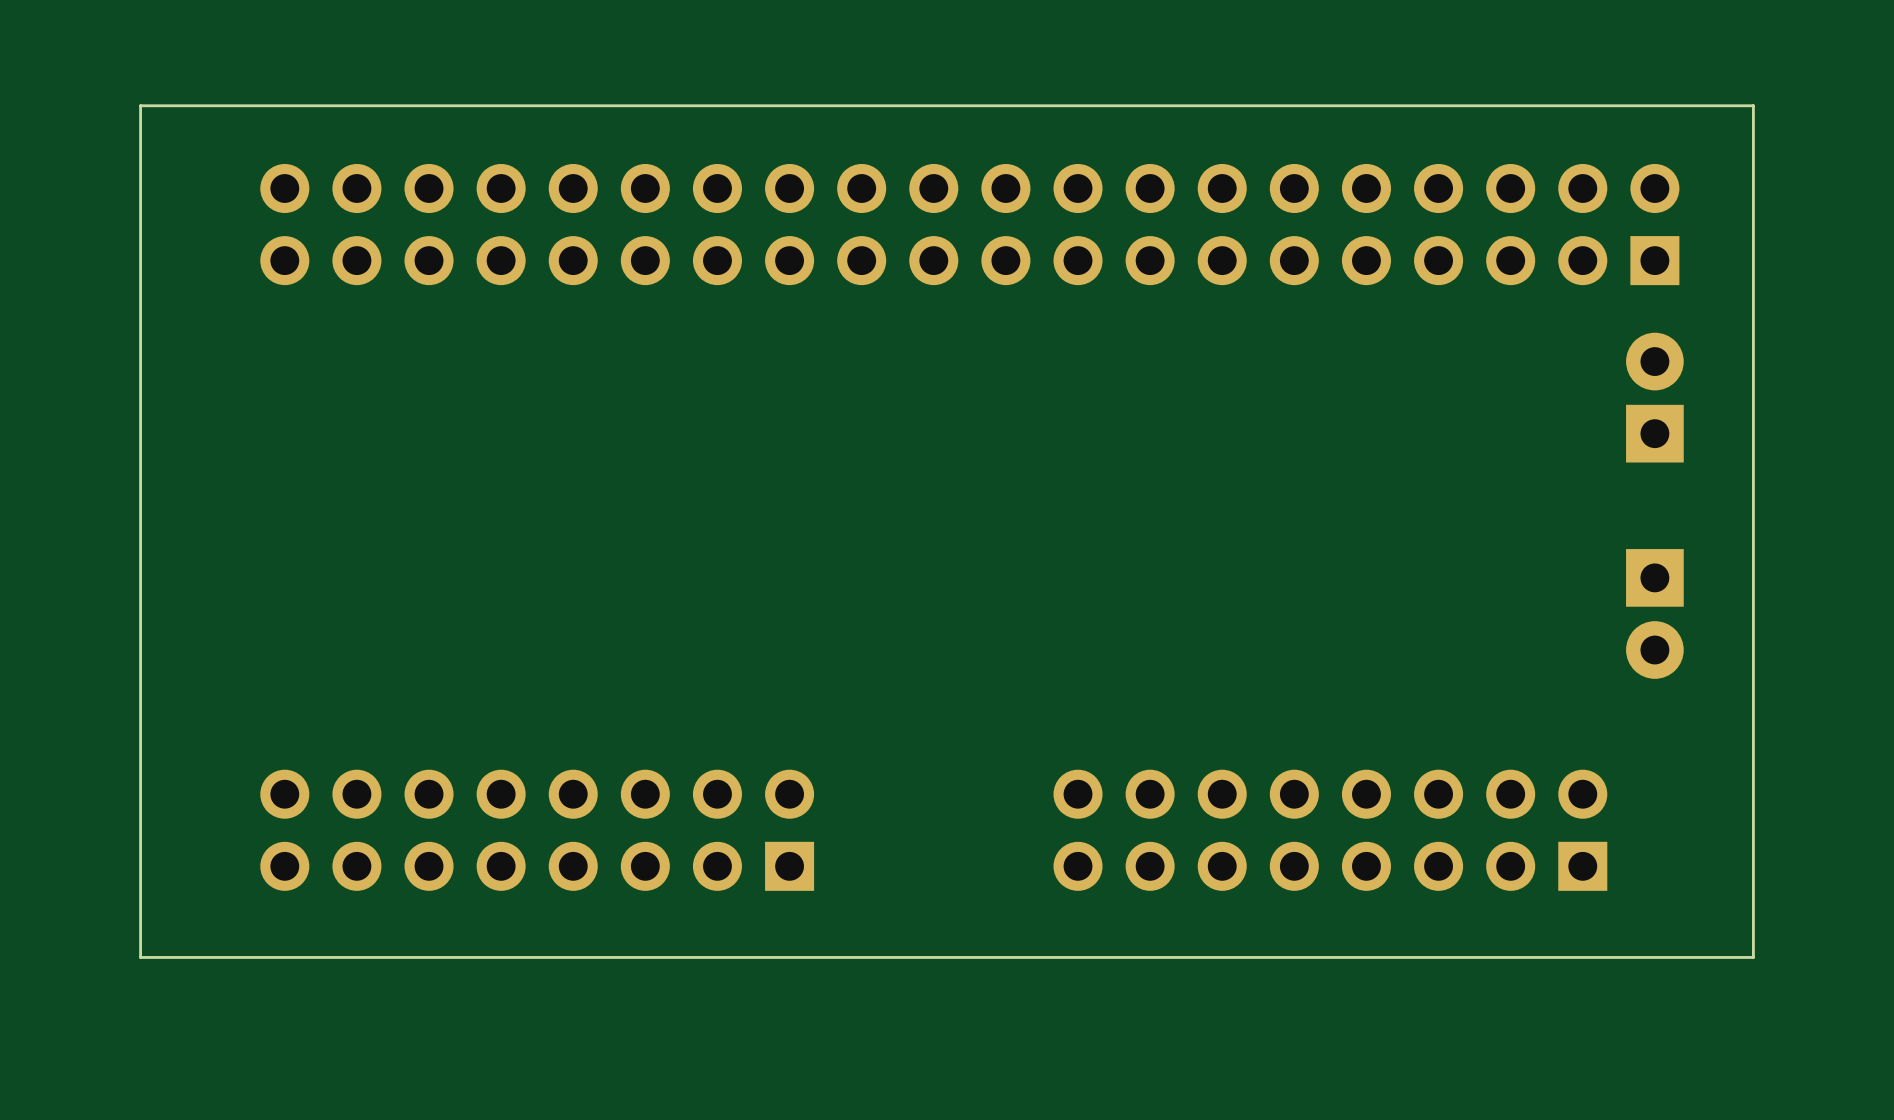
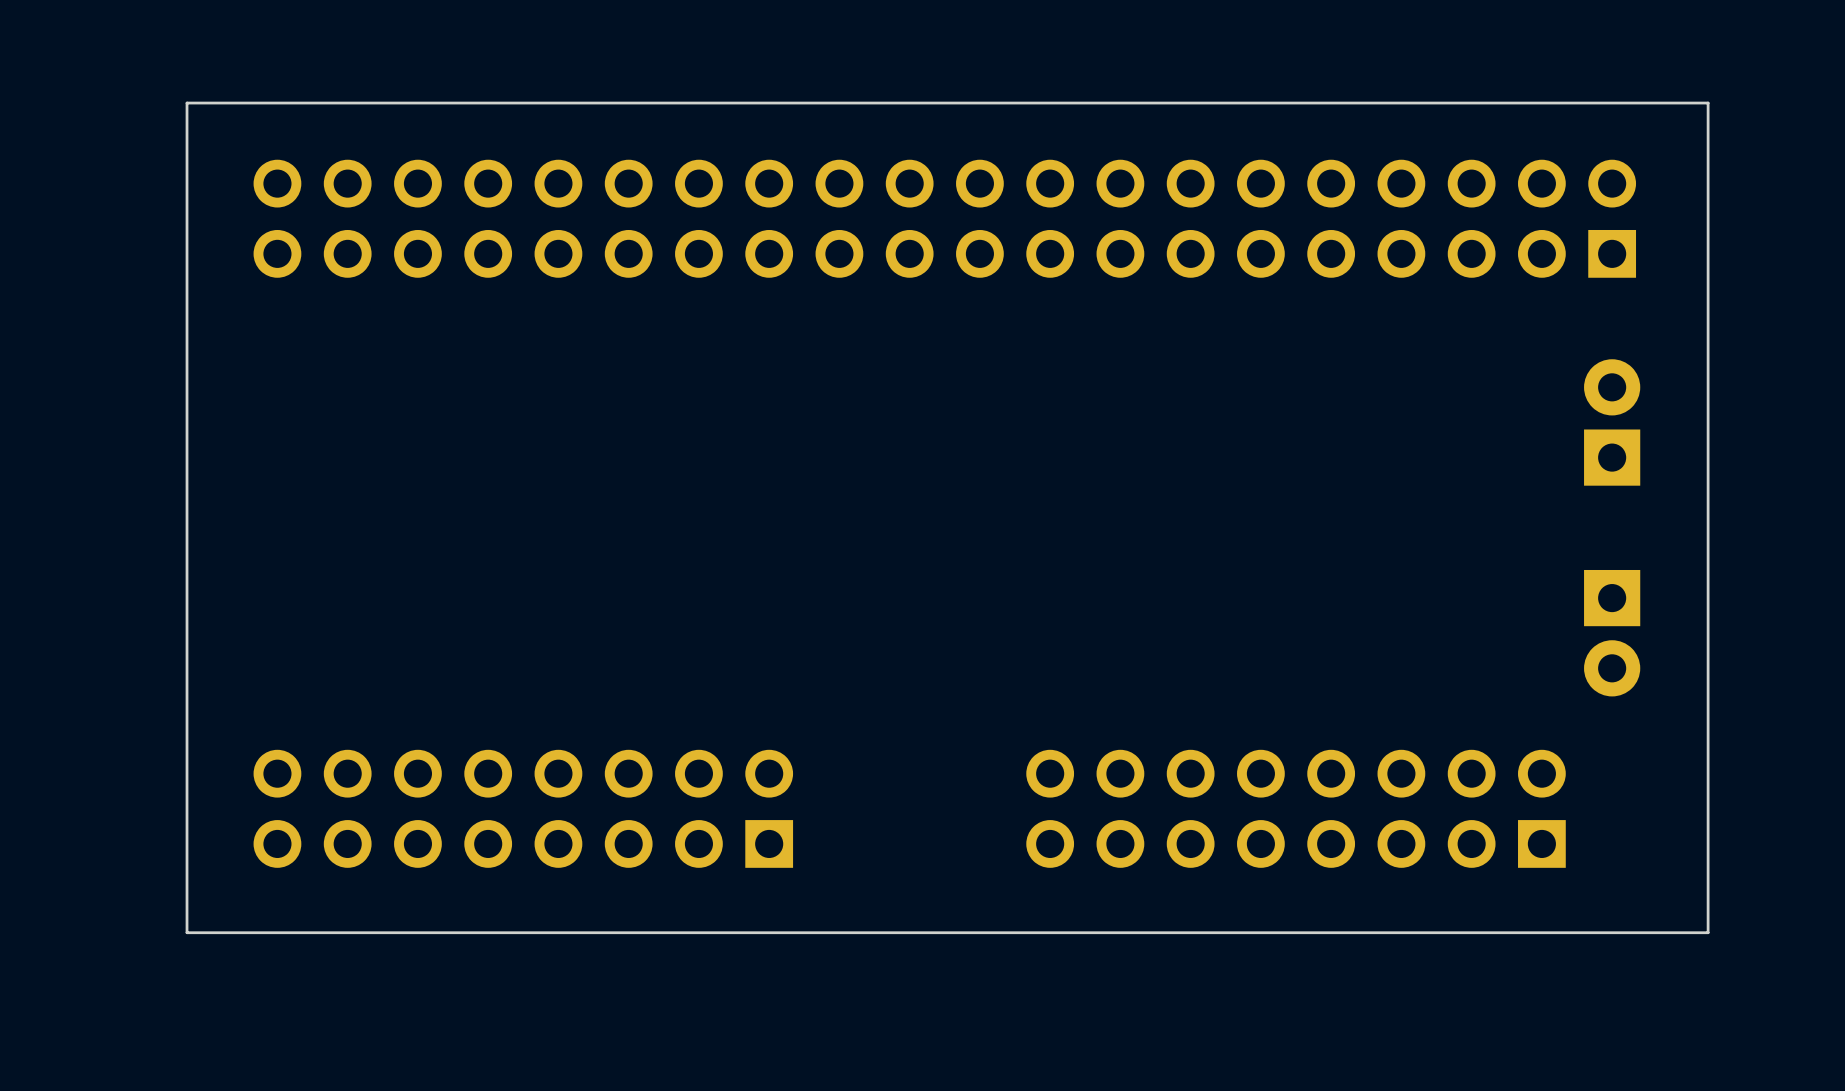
board edge: (191, 105) (140, 105) (140, 957) (191, 957) -> (187, 103) (187, 932)
part position: (1654, 397) -> (1612, 422)
part position: (1654, 613) -> (1612, 633)

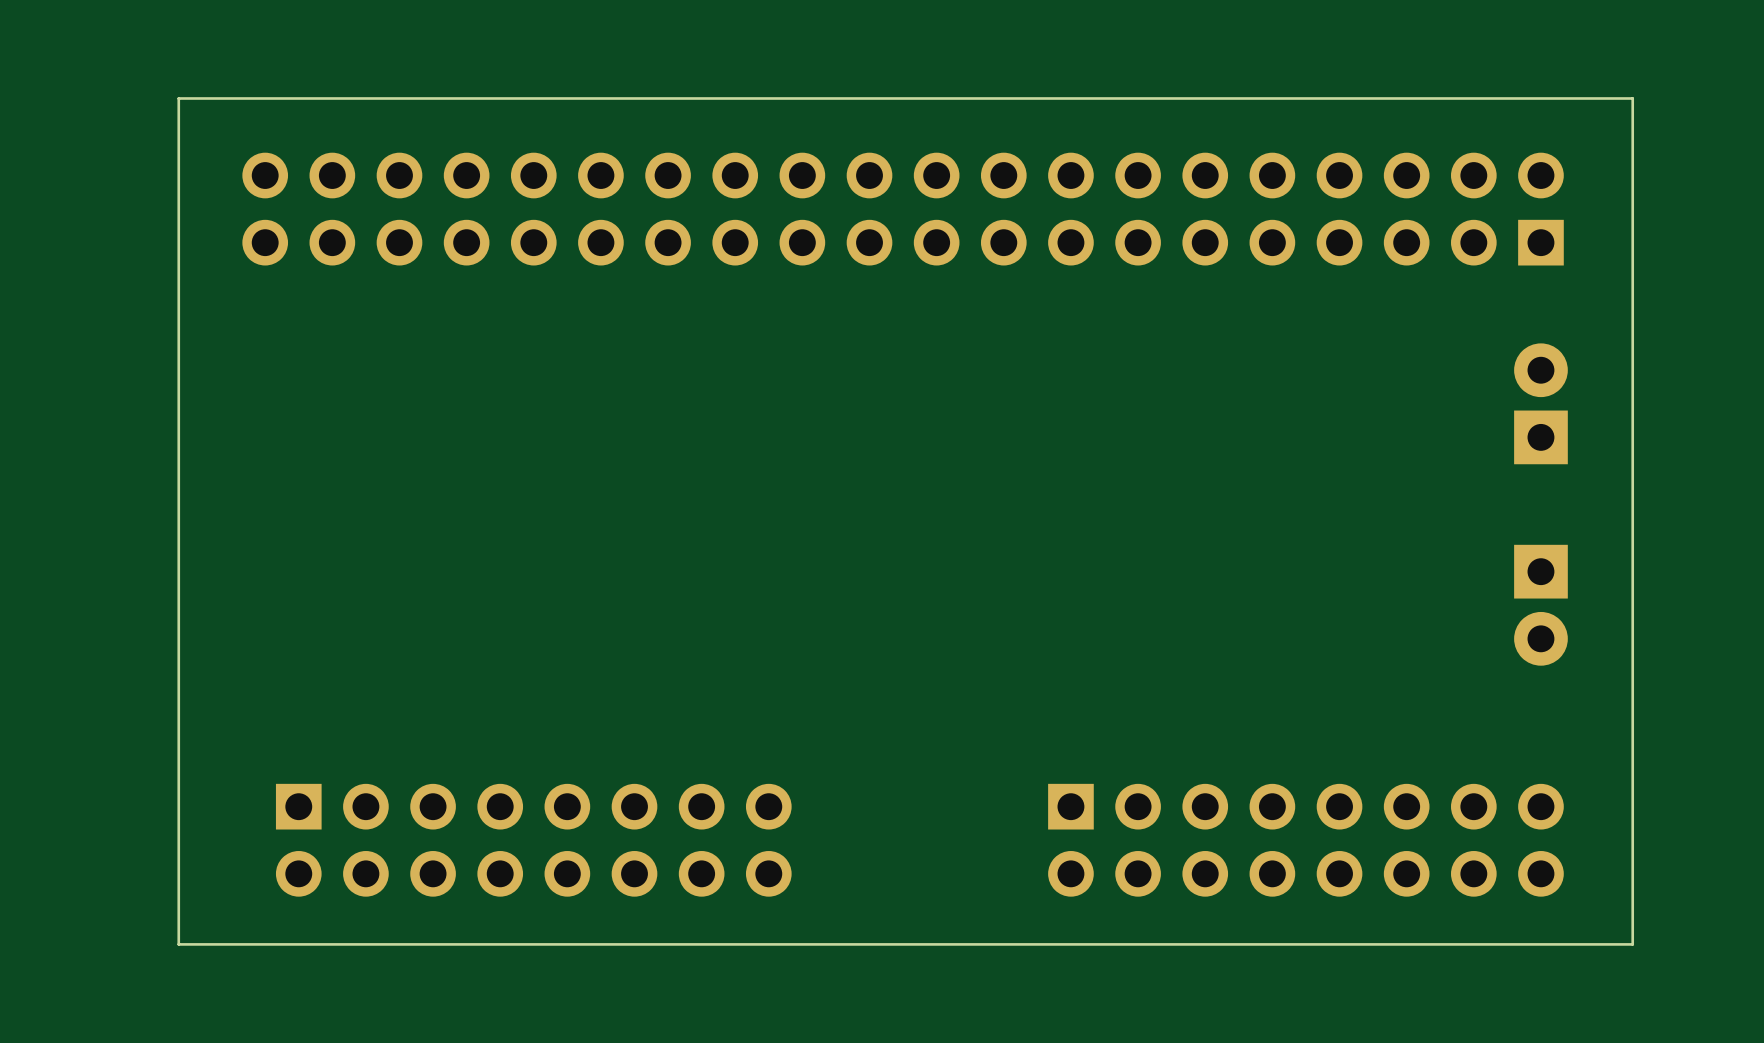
part rotation: 0° (523, 808) -> 180° (533, 840)
part rotation: 0° (1296, 808) -> 180° (1305, 840)
board edge: (1708, 932) (187, 932) -> (1632, 891) (1632, 944) (178, 944) (178, 891)

